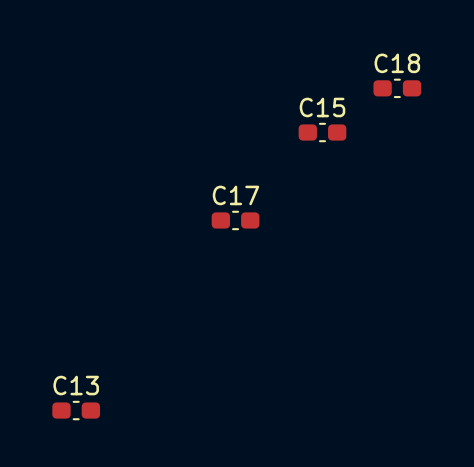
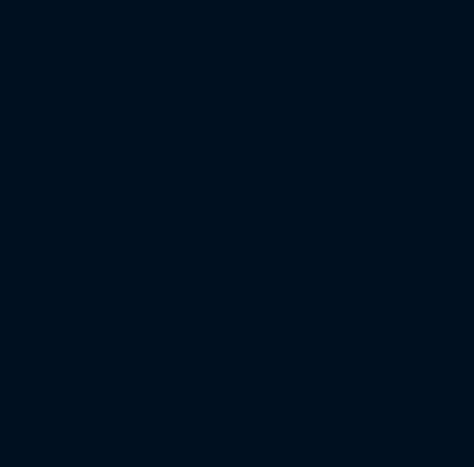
C18: (397, 88) -> none
C15: (322, 132) -> none
C17: (235, 220) -> none
C13: (76, 410) -> none

